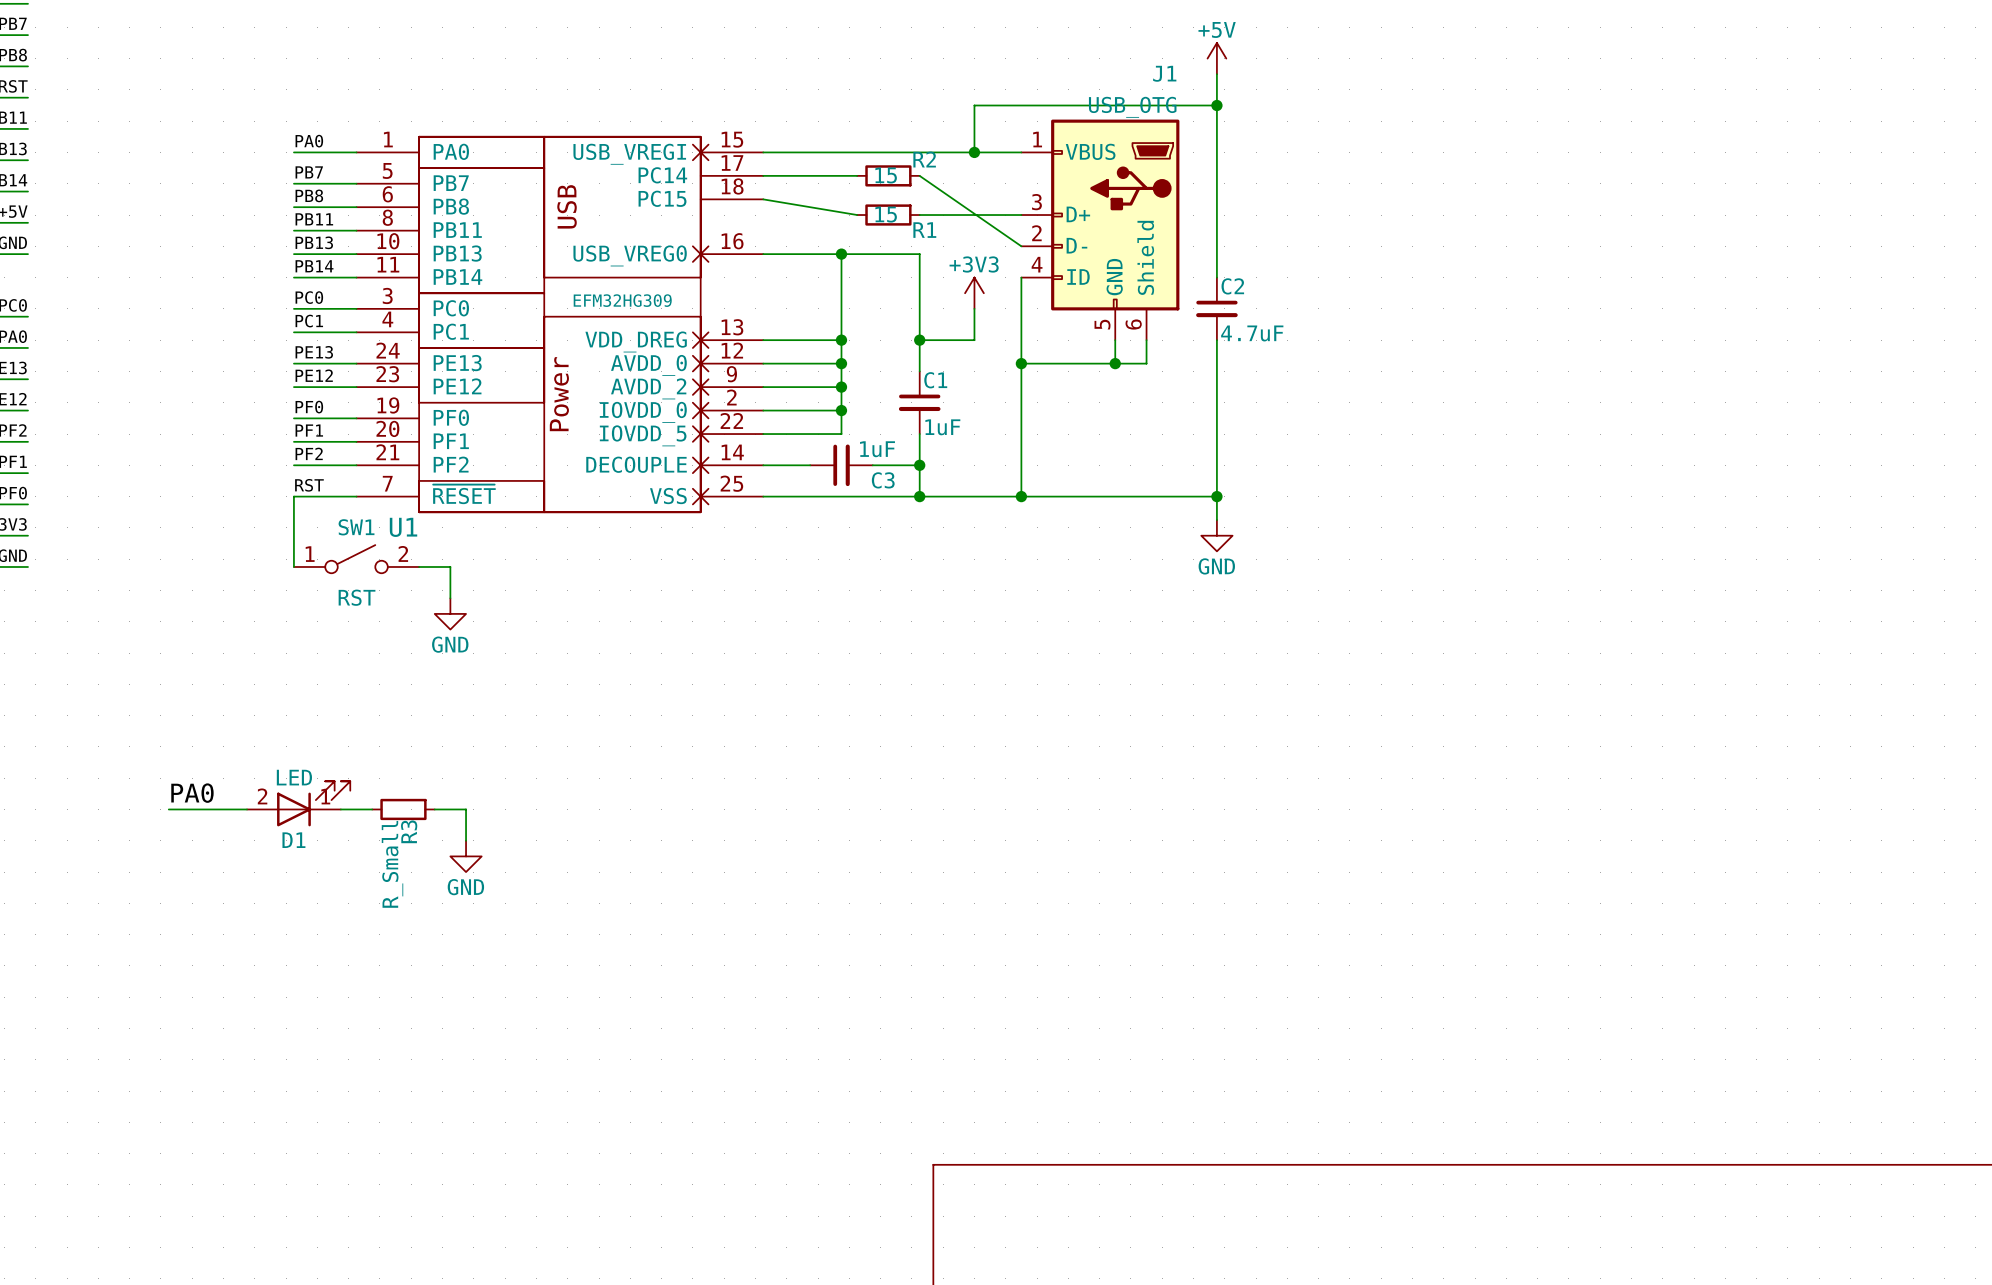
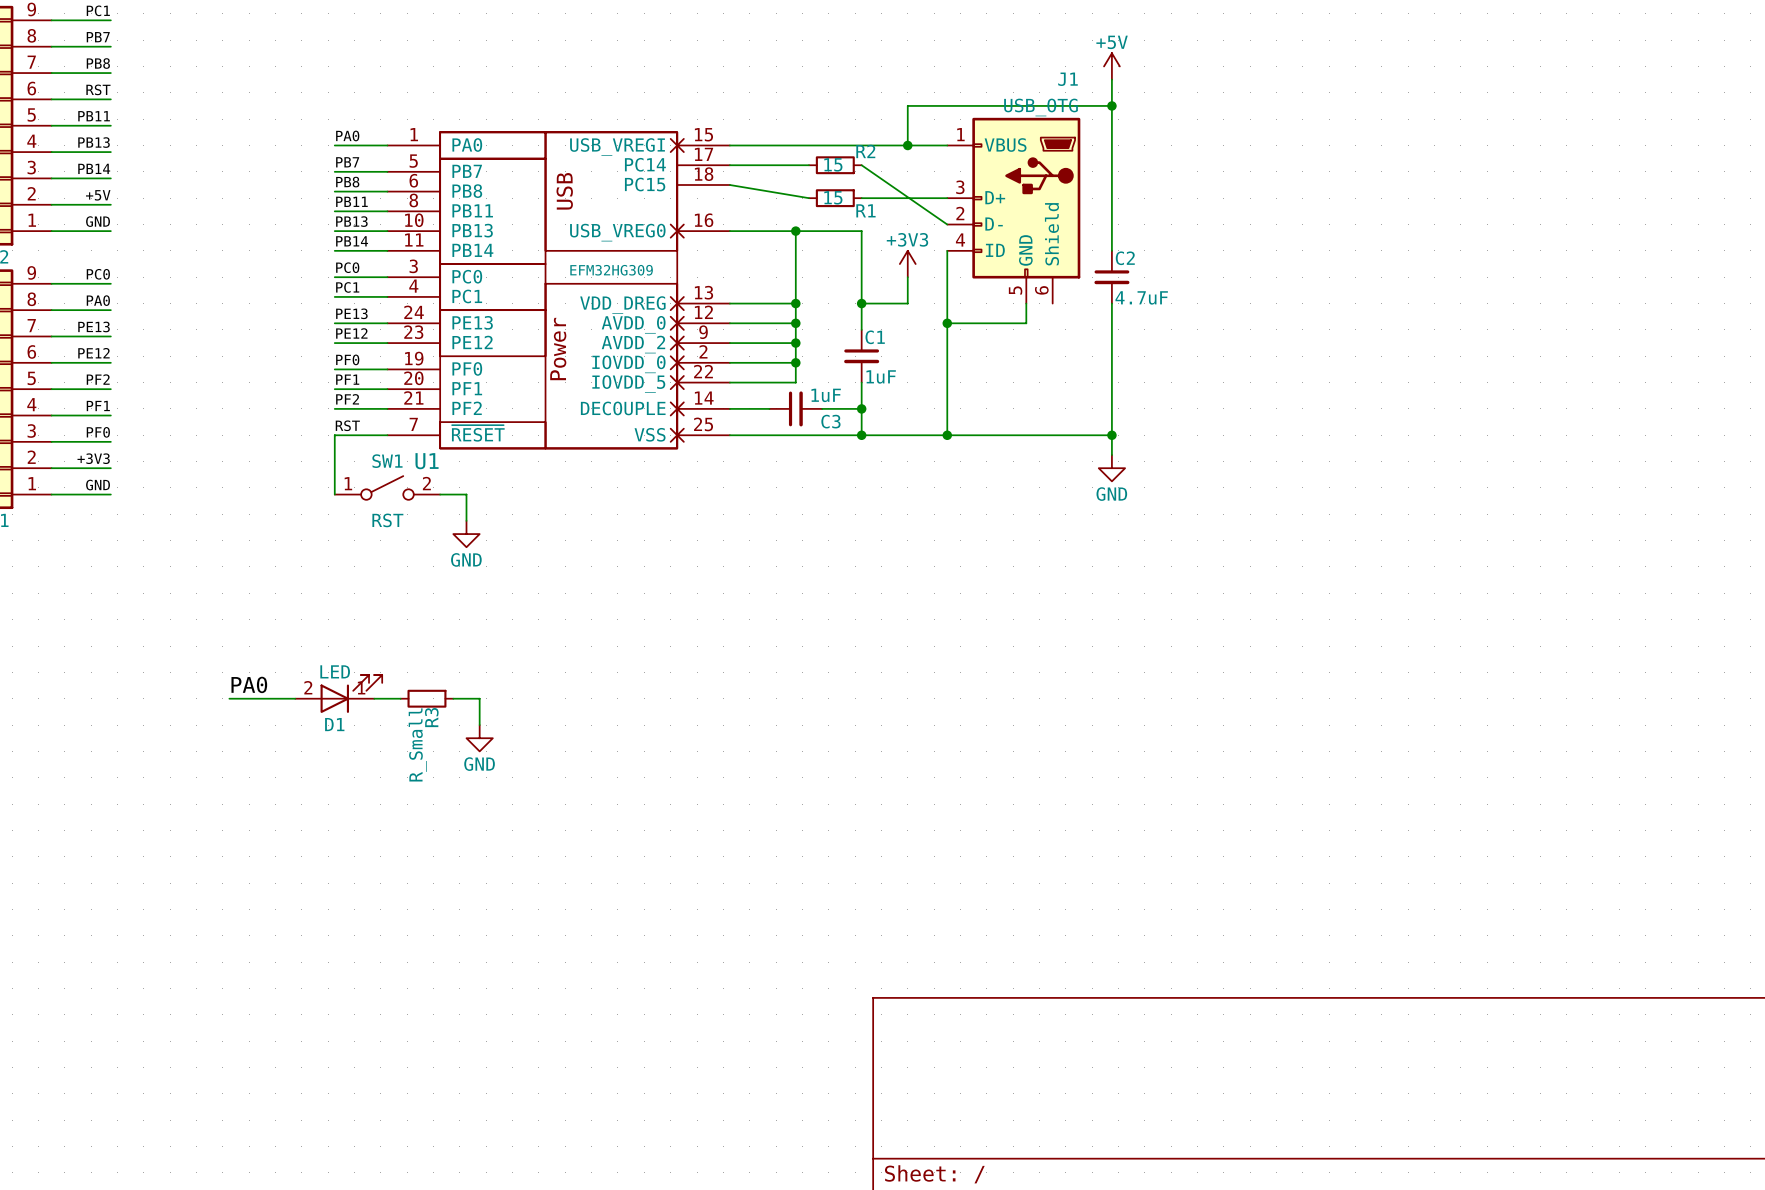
wire: (1146, 340) (1146, 363) (1115, 363) -> none
junction: (1115, 363) -> none

